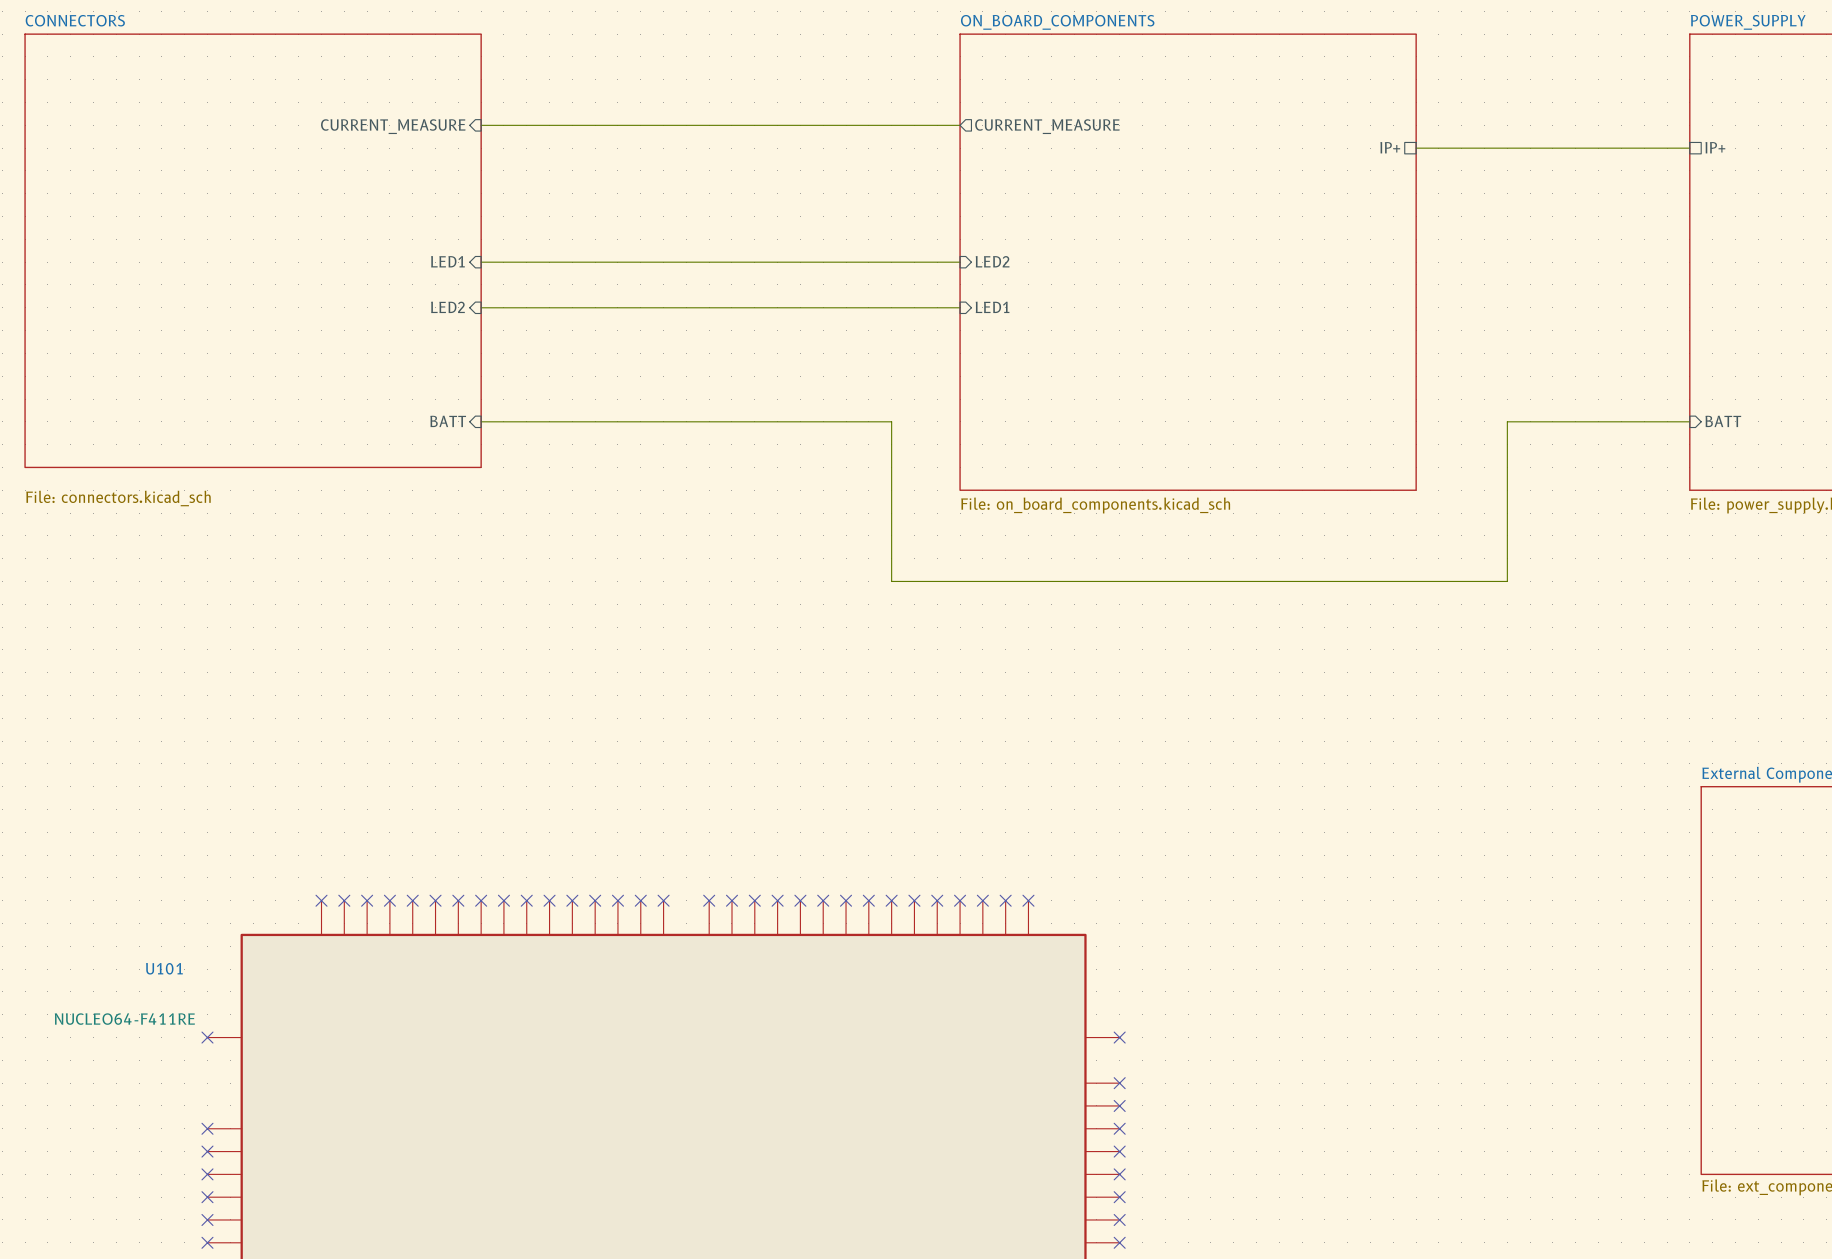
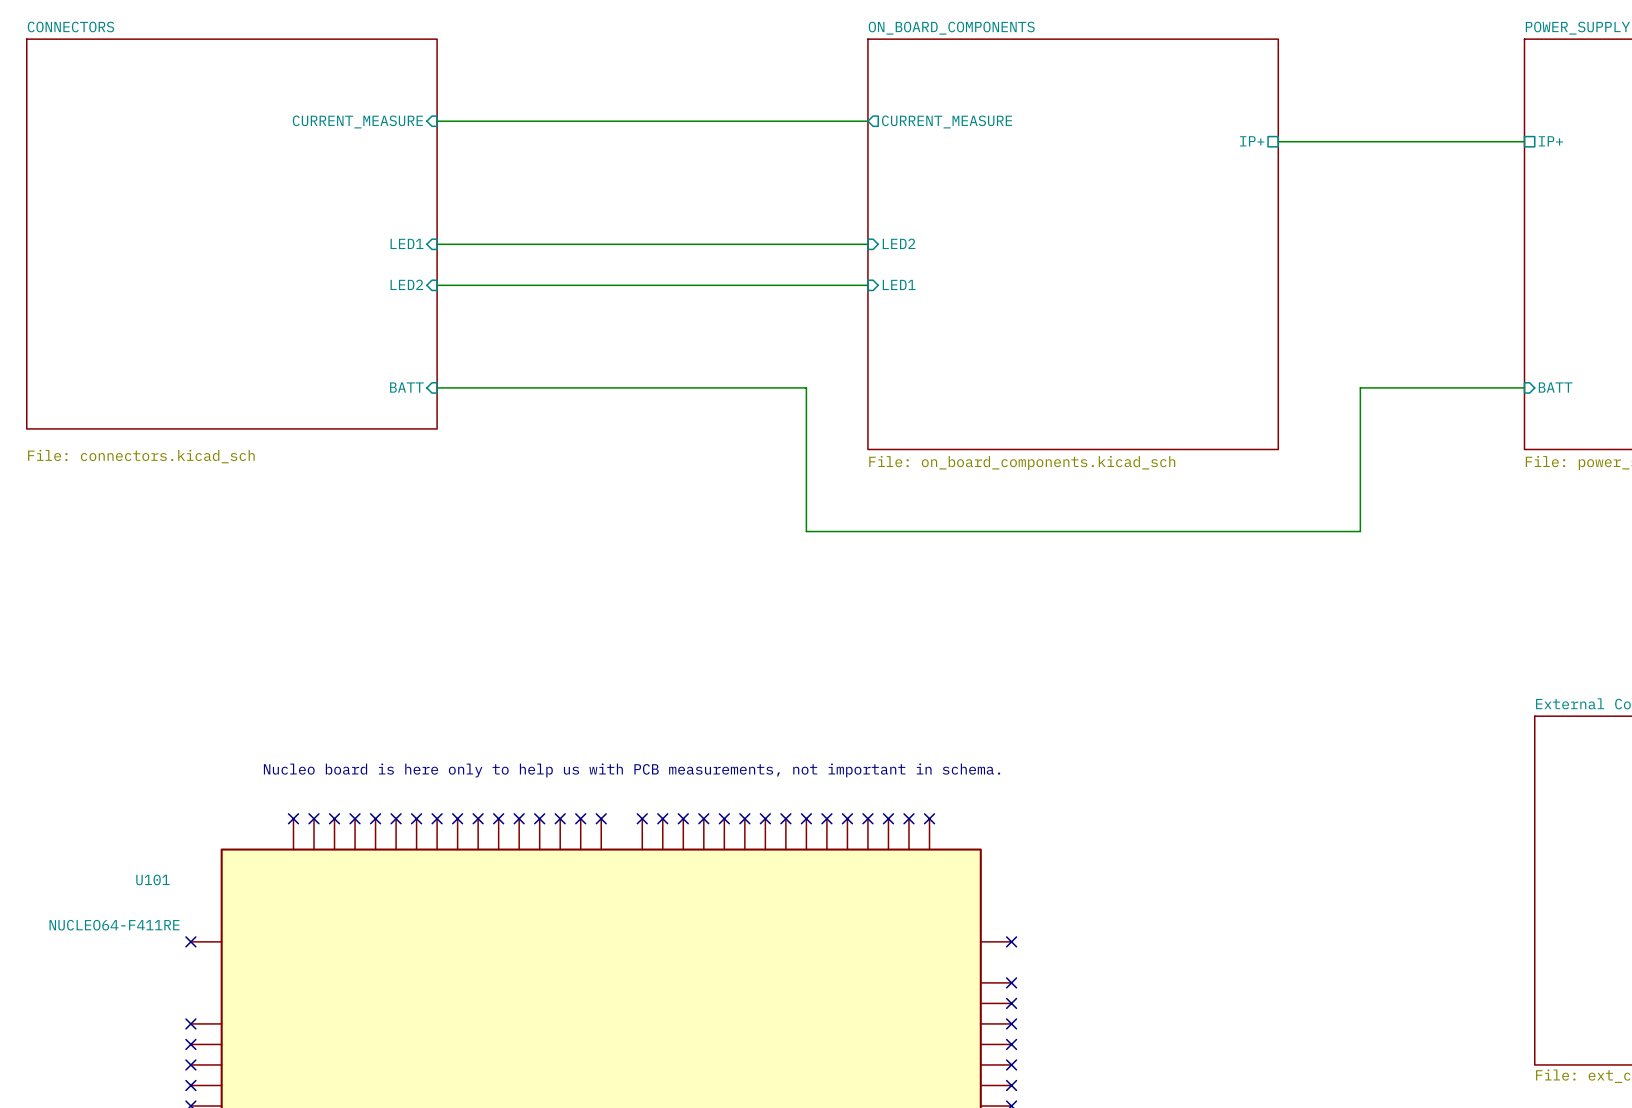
text: none -> Nucleo board is here only to help us with PCB measurements, not important in schema. (632, 770)

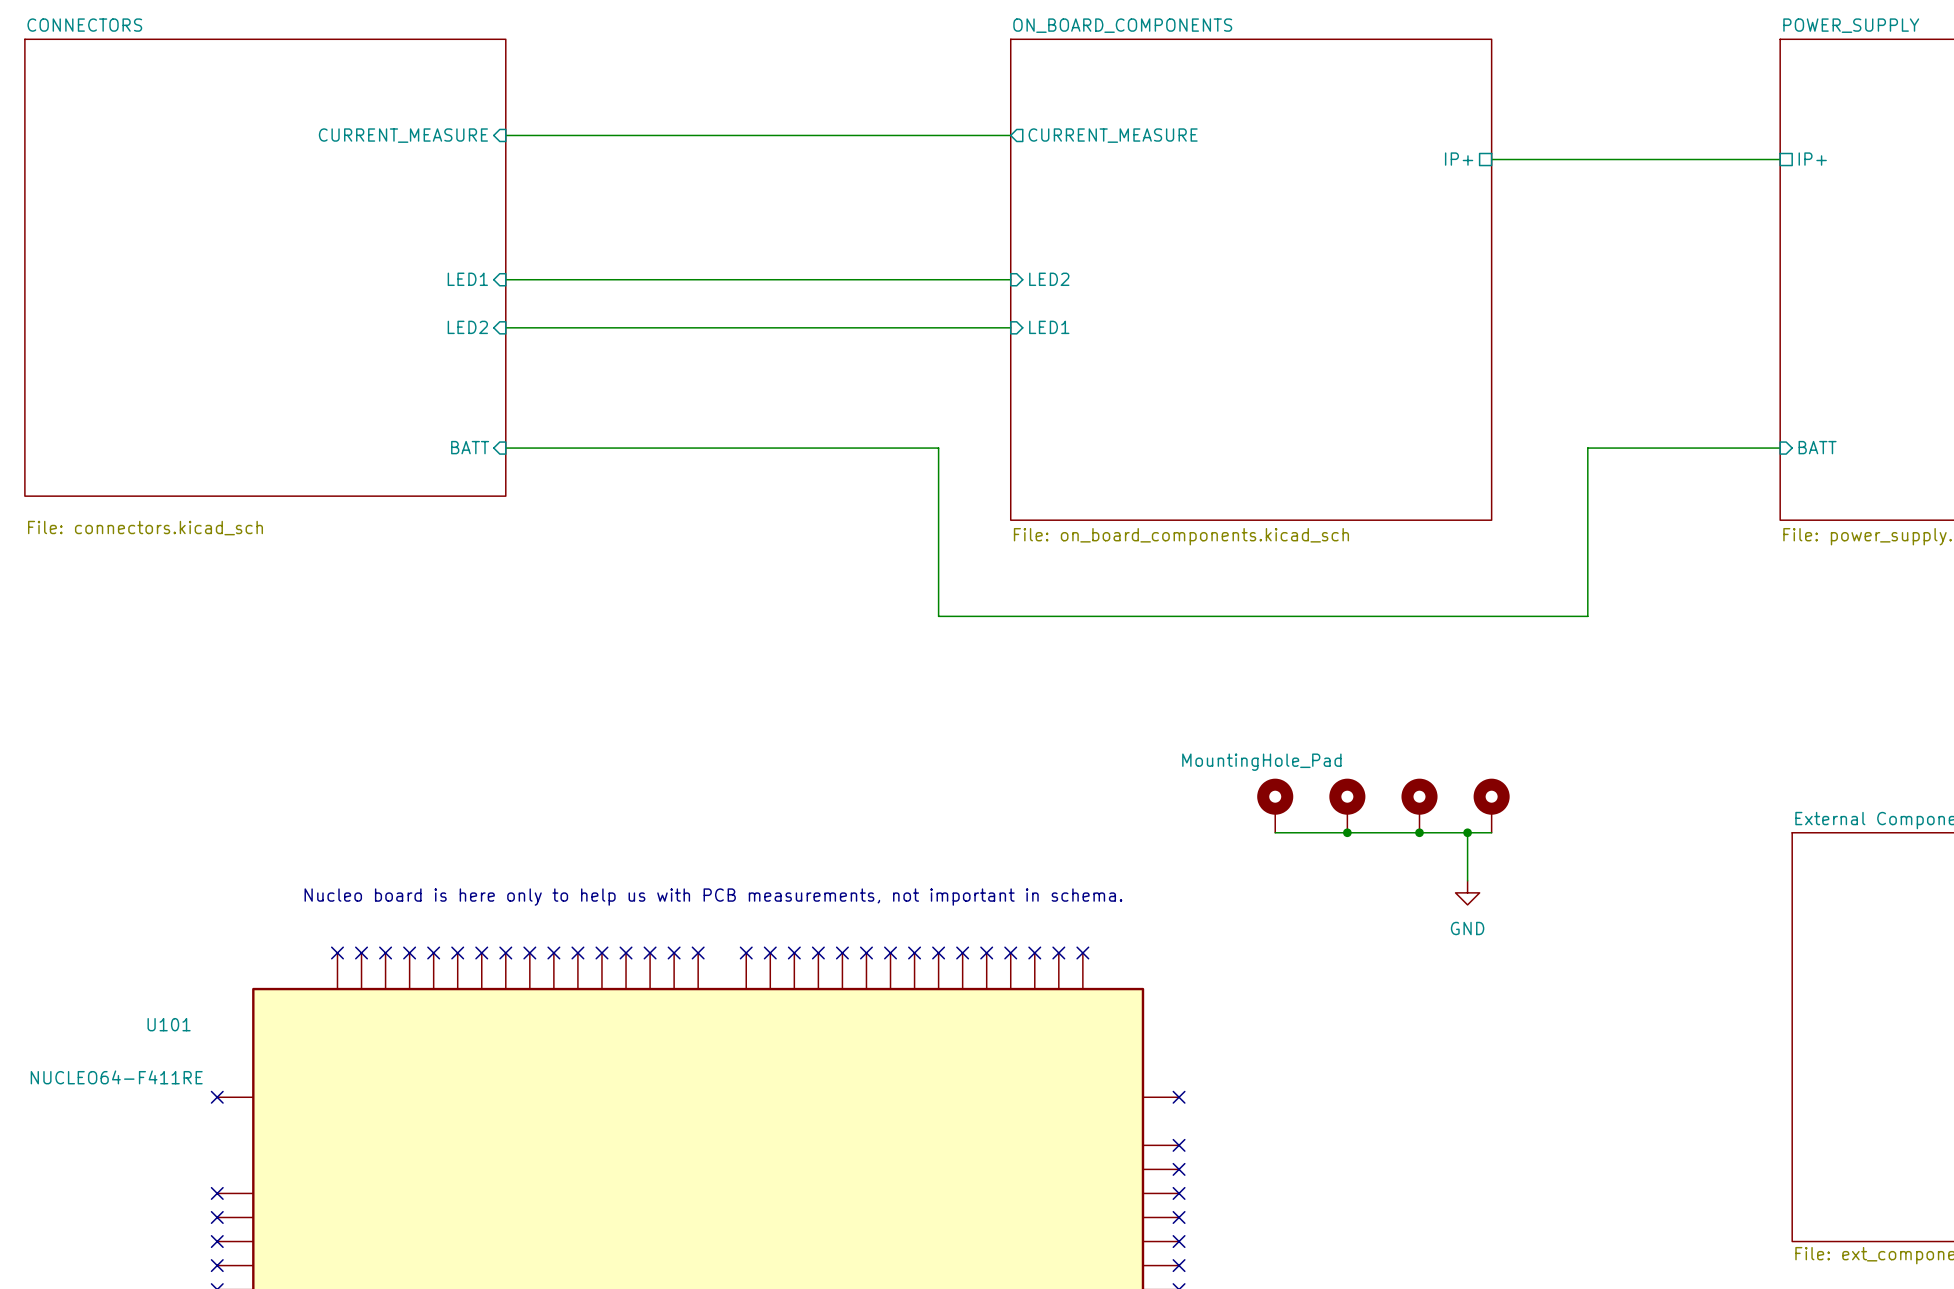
part: none -> MountingHole_Pad (1275, 805)
part: none -> (1347, 805)
part: none -> (1419, 805)
part: none -> (1491, 805)
wire: none -> (1275, 832) (1491, 832)
junction: none -> (1347, 832)
junction: none -> (1419, 832)
wire: none -> (1467, 832) (1467, 880)
junction: none -> (1467, 832)
power symbol: none -> GND (1467, 892)

